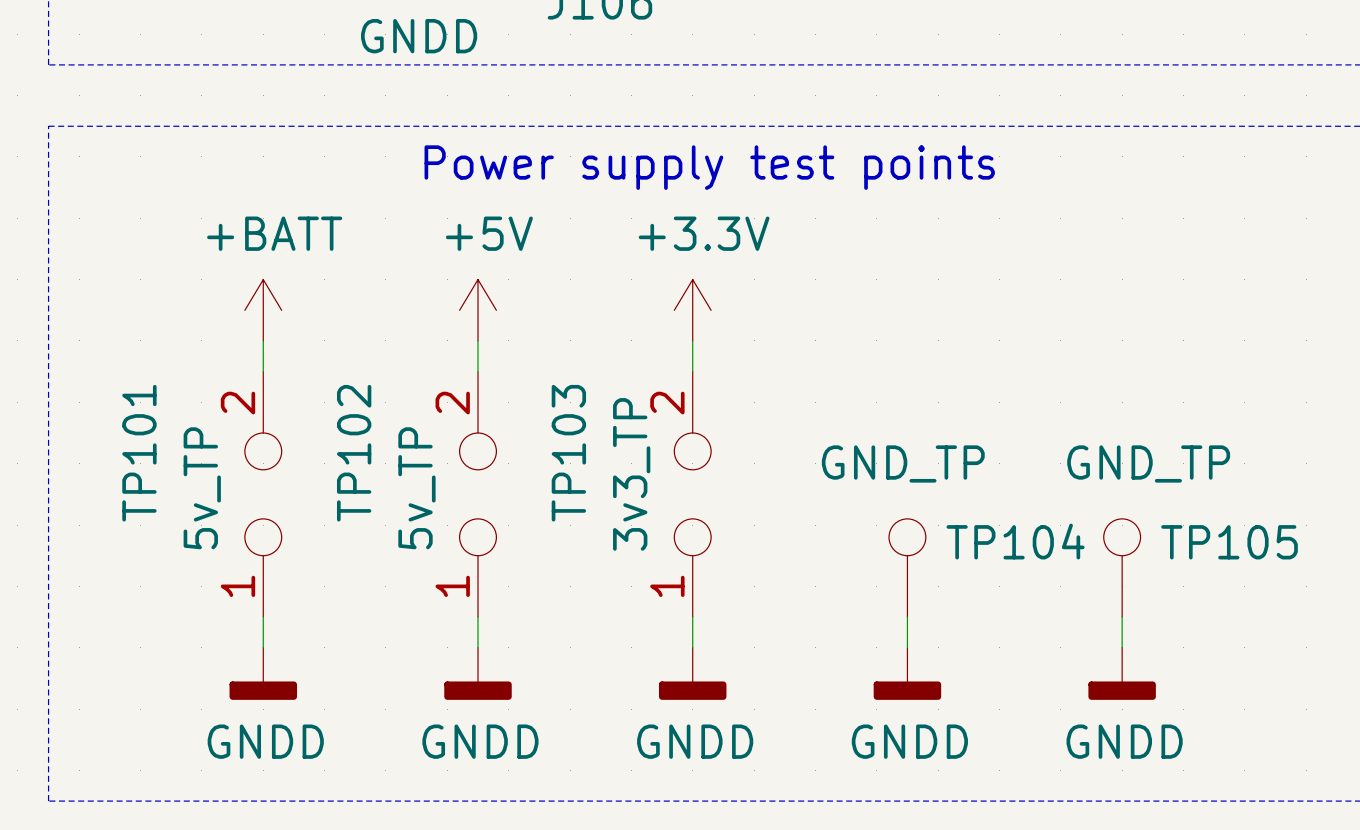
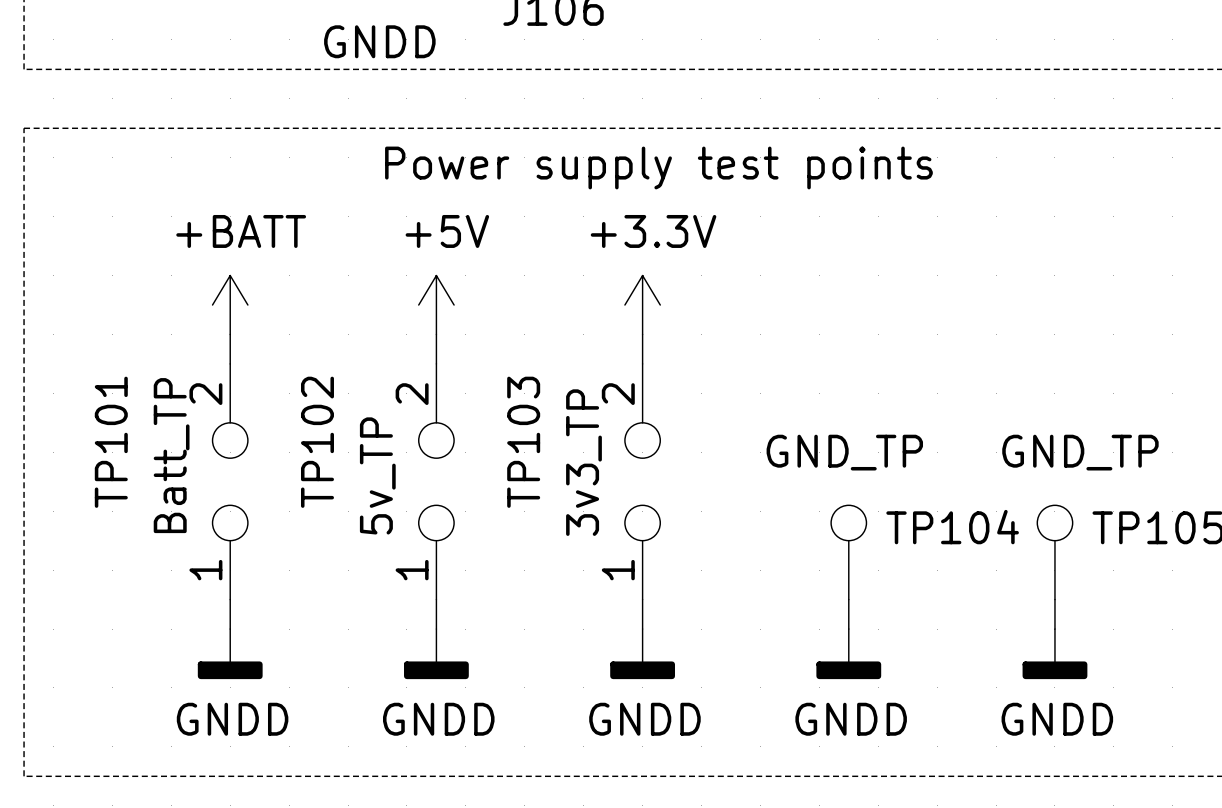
TP101 value: 5v_TP (202, 488) -> Batt_TP (171, 455)

